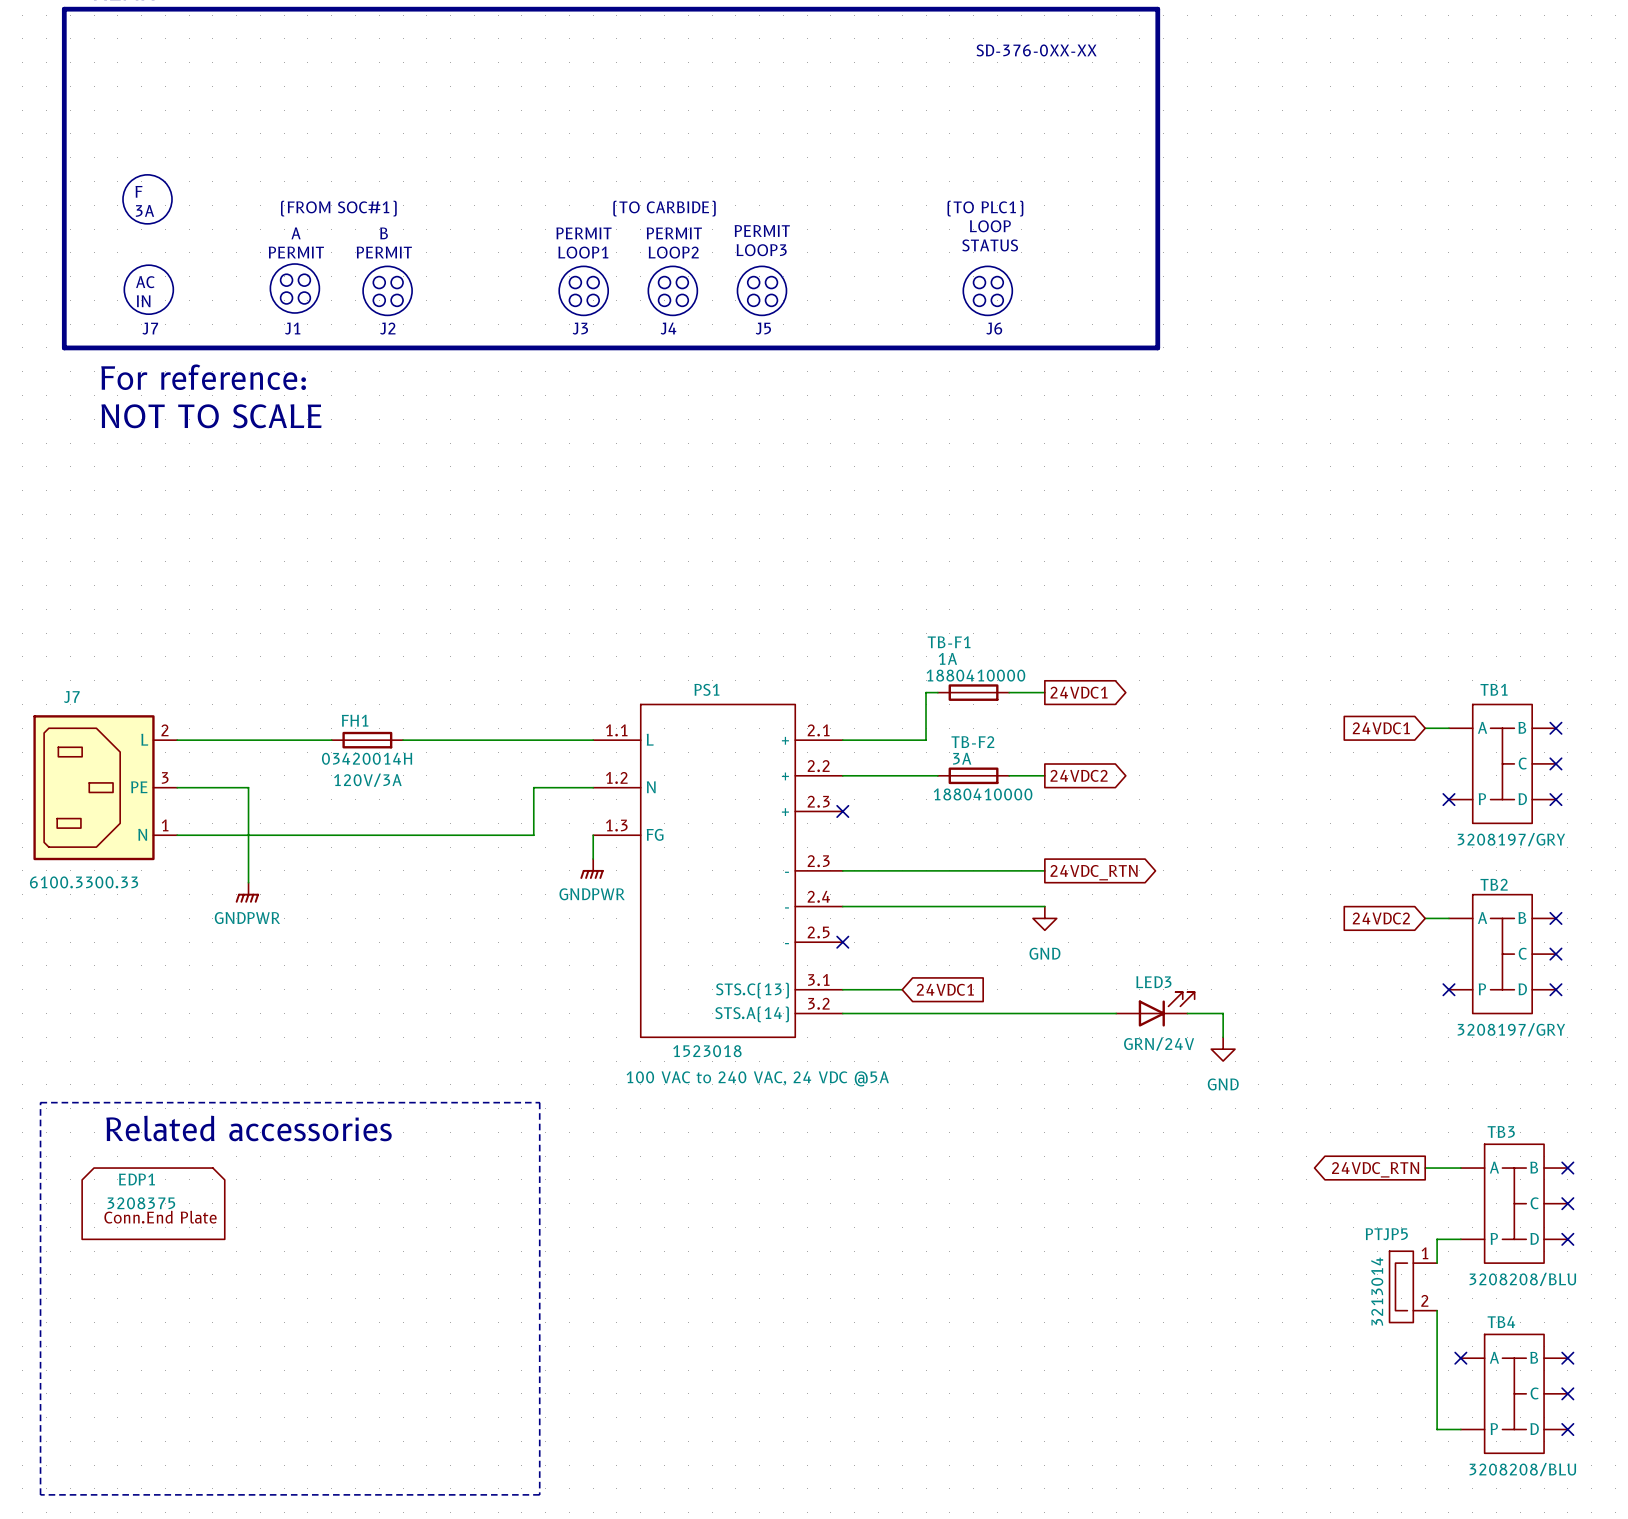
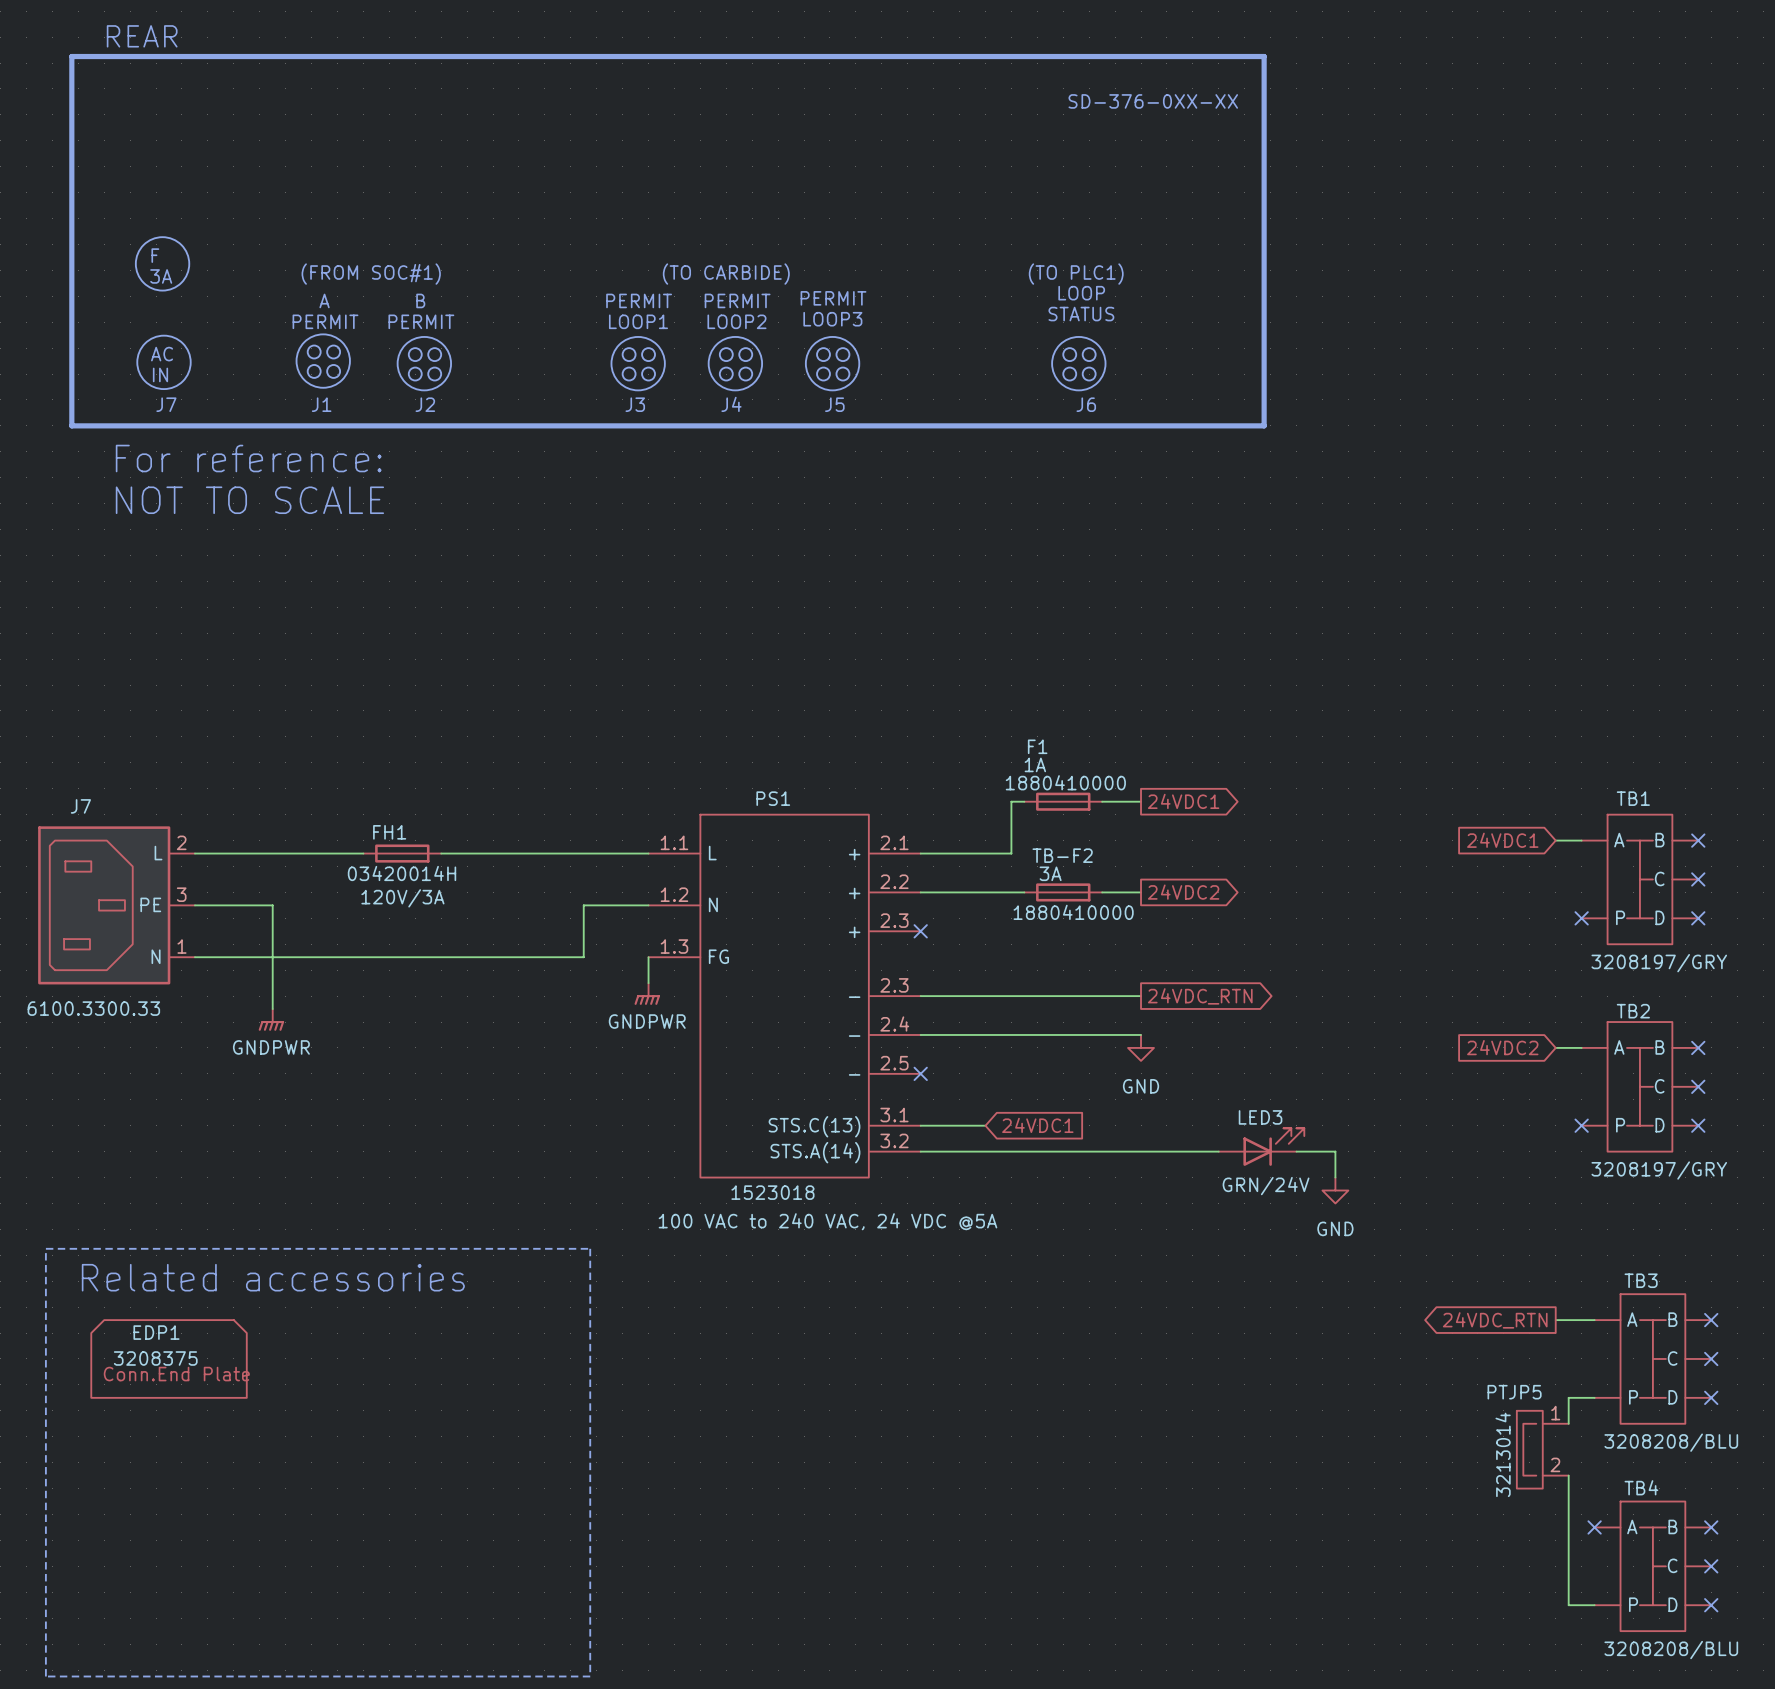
TB-F1 name: TB-F1 (949, 642) -> F1 (1037, 746)

